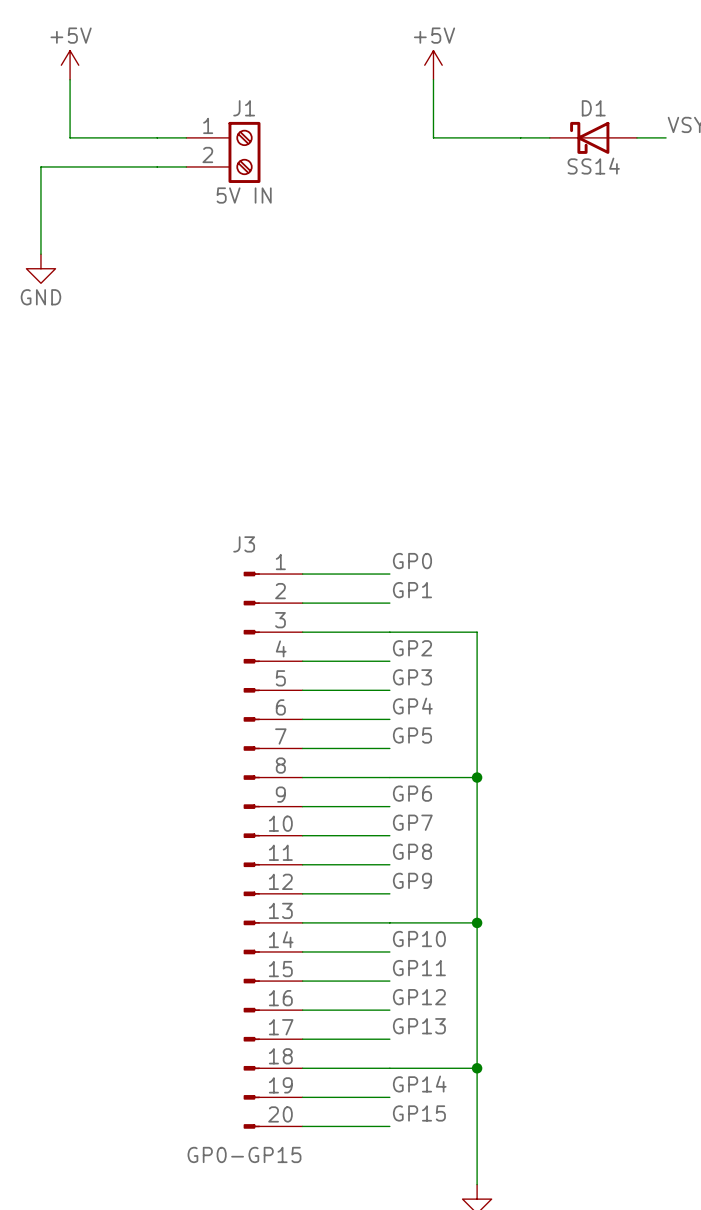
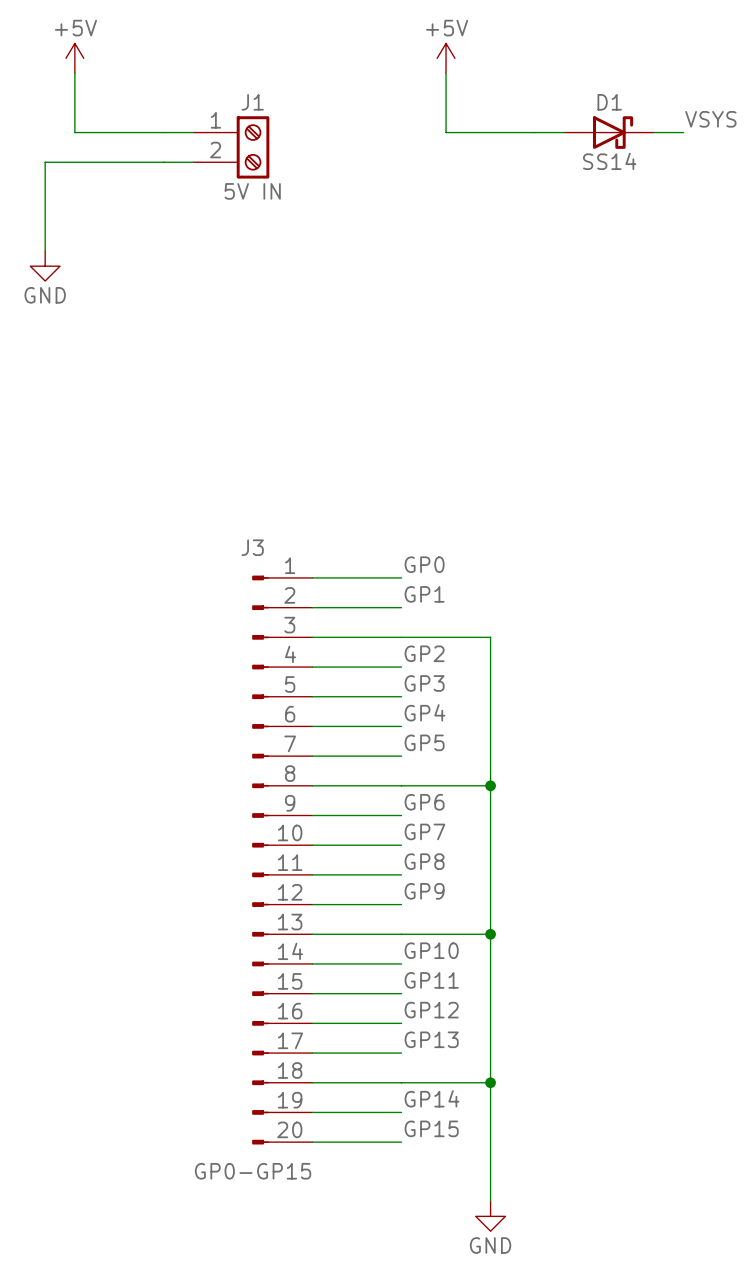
D1 flip: as is (589, 137) -> left-right (613, 132)

